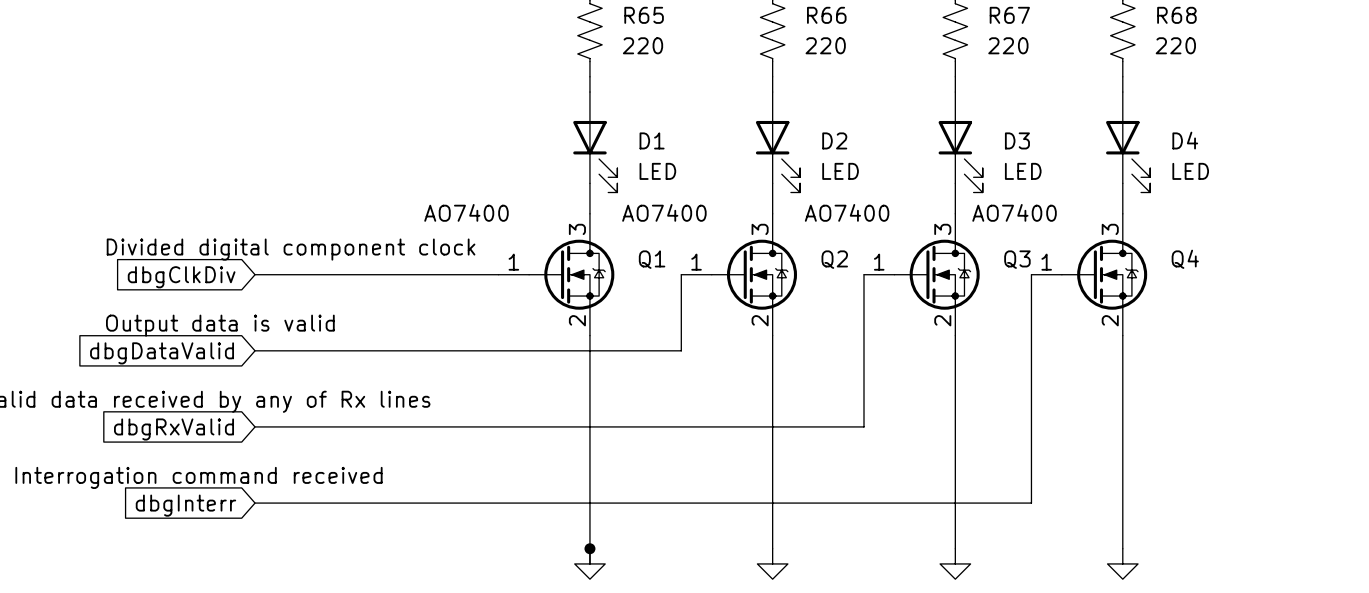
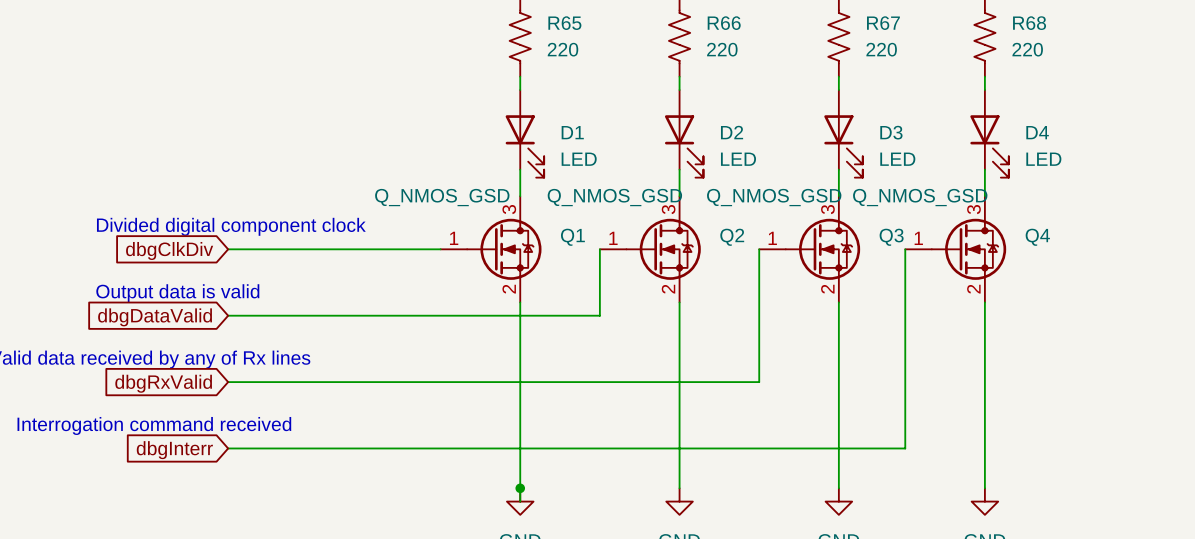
Q1 value: AO7400 (466, 212) -> Q_NMOS_GSD (442, 197)
Q2 value: AO7400 (664, 212) -> Q_NMOS_GSD (614, 197)
Q3 value: AO7400 (847, 212) -> Q_NMOS_GSD (774, 197)
Q4 value: AO7400 (1014, 212) -> Q_NMOS_GSD (920, 197)

